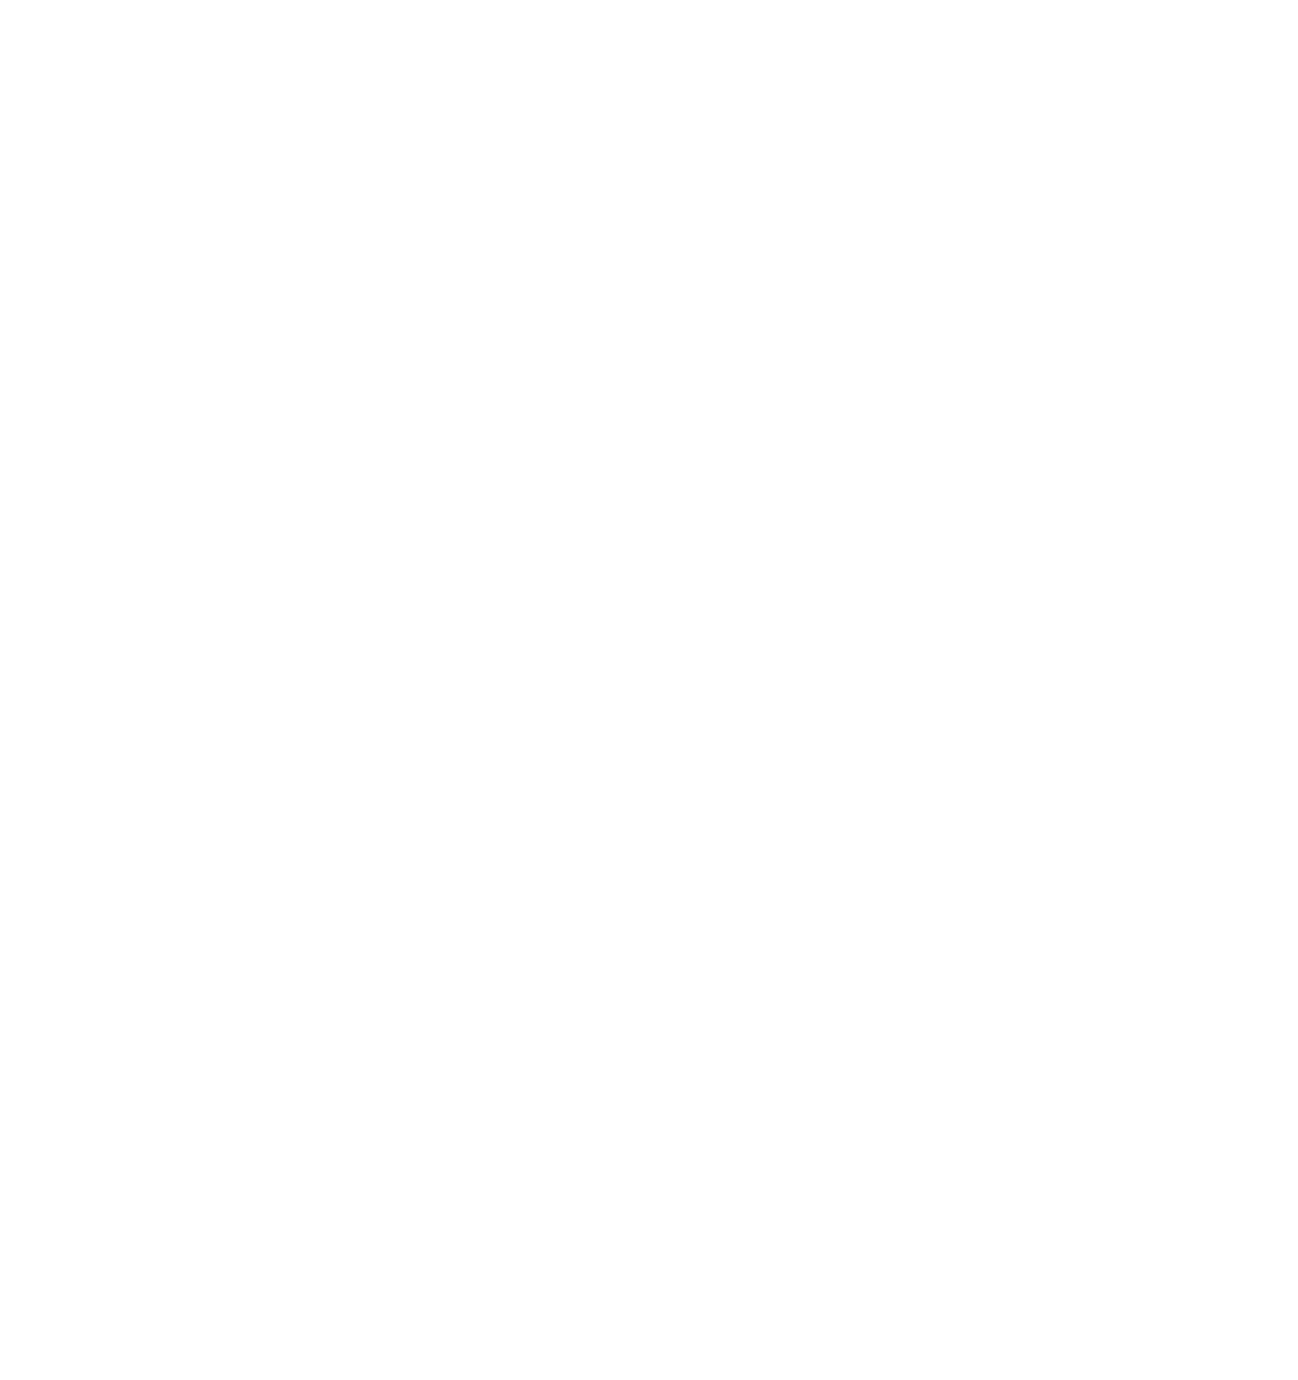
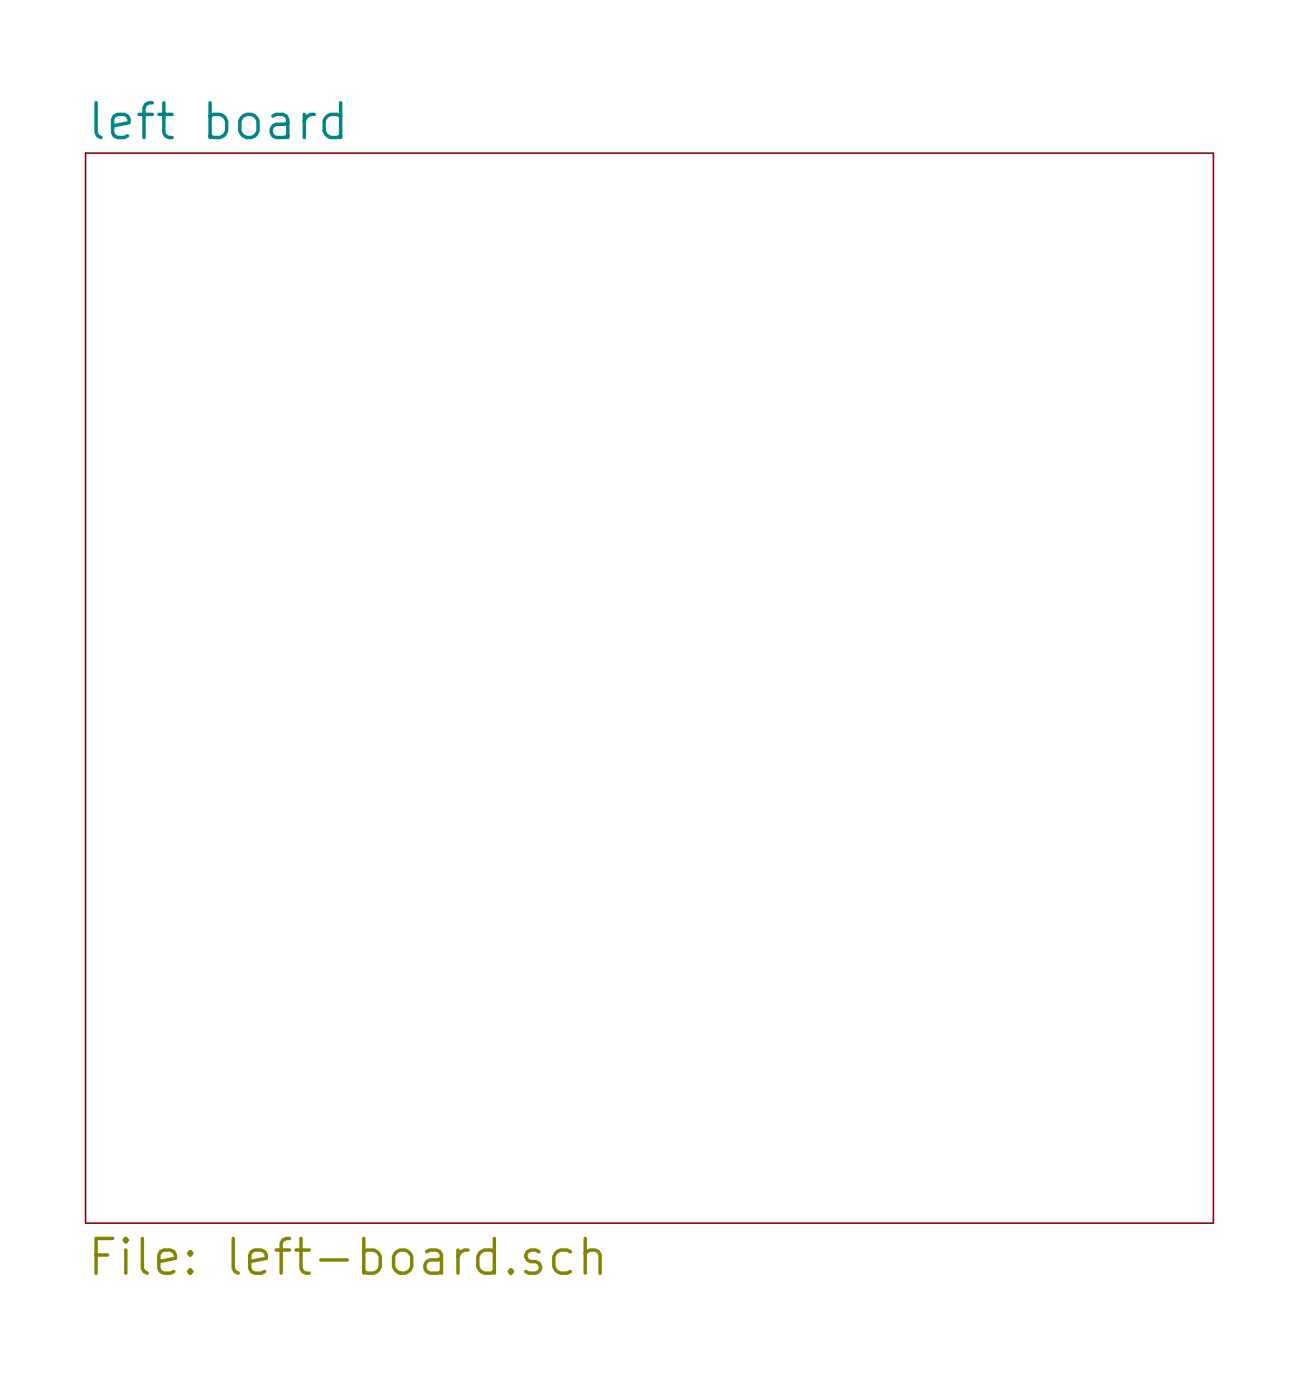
sheet left board: none -> File: left-board.sch (649, 688)

